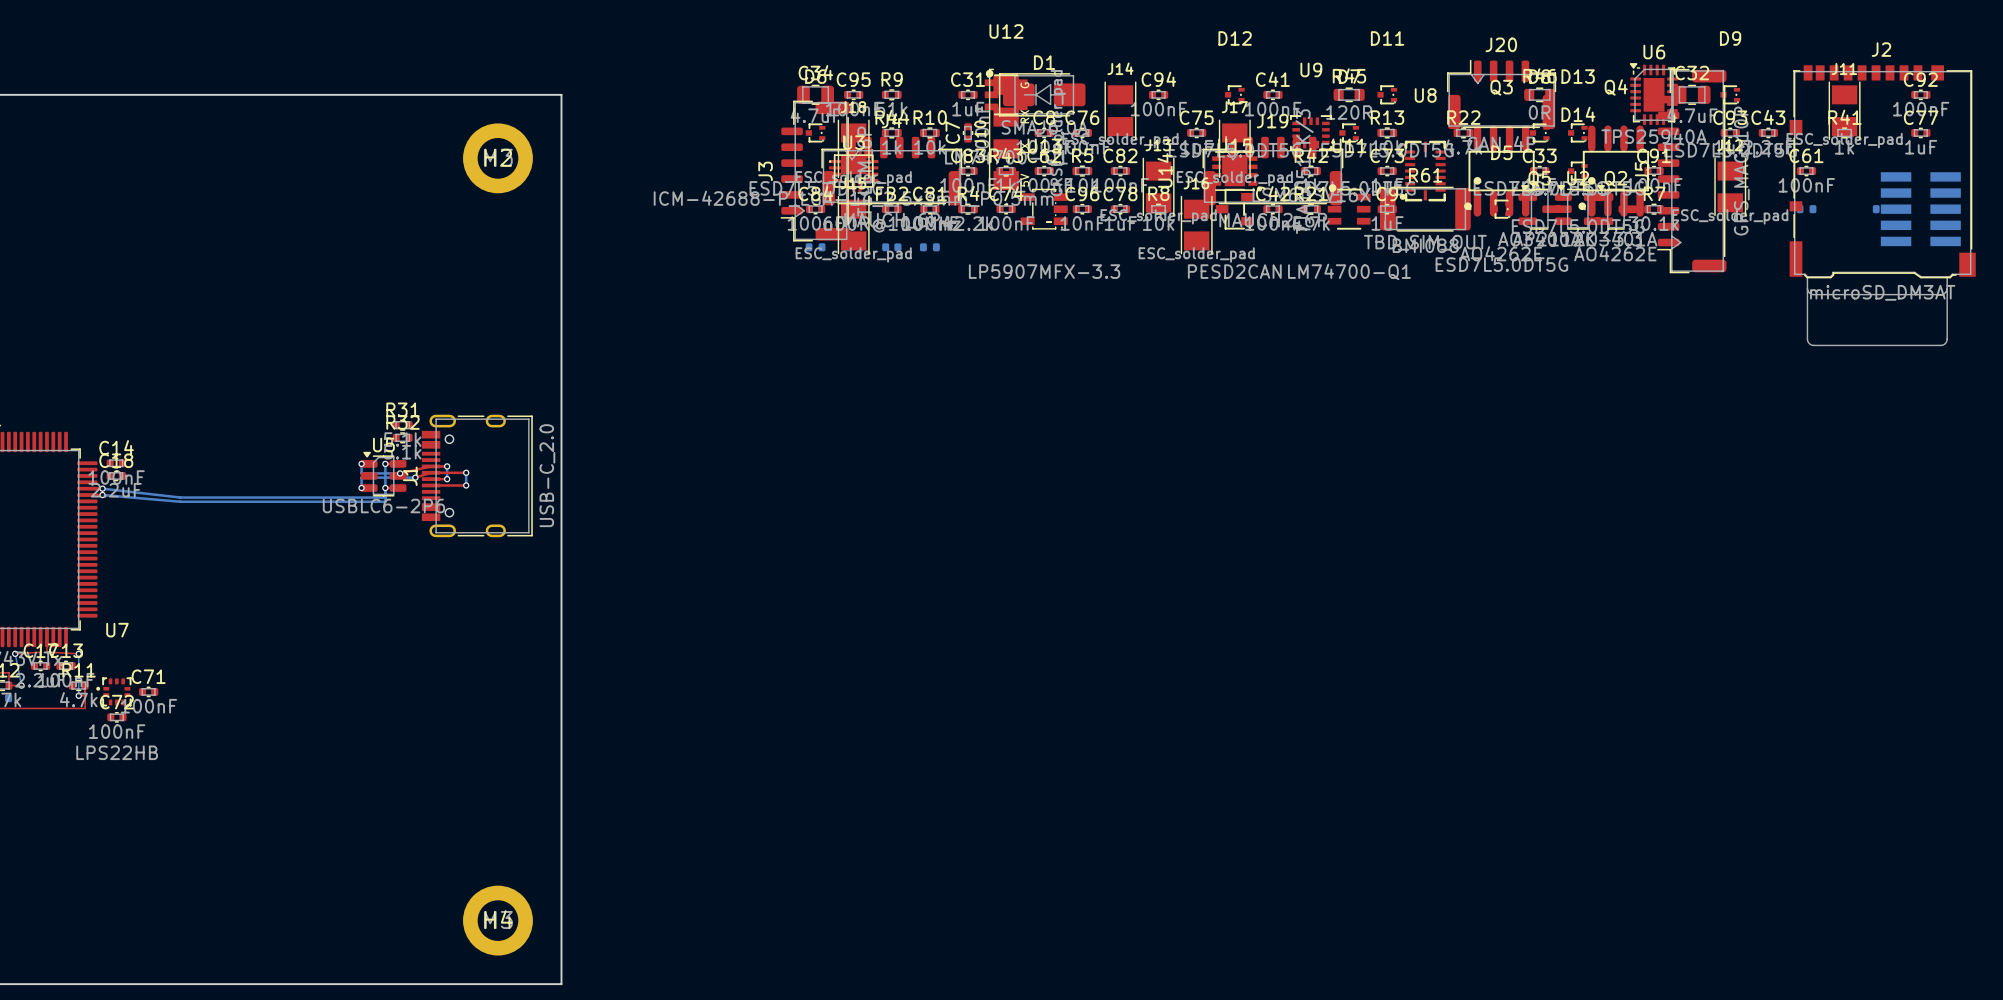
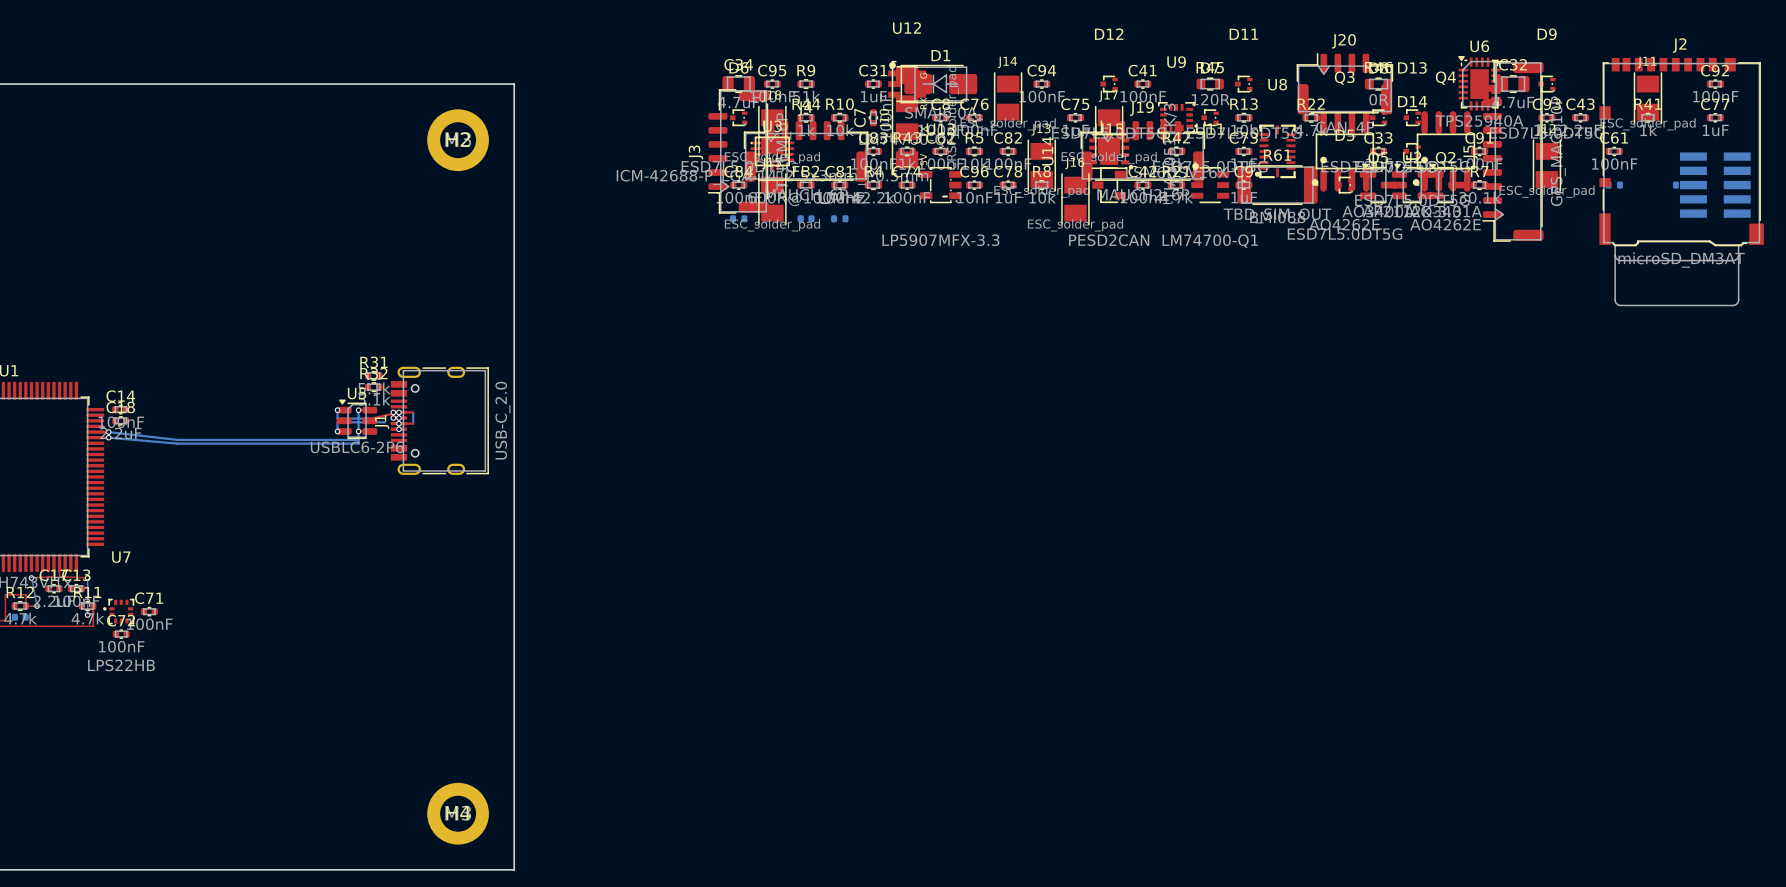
via: none -> (393, 412)
via: none -> (398, 412)
via: (447, 466) -> none
via: none -> (393, 418)
via: none -> (398, 418)
top track: (466, 472) (431, 472) (415, 477) -> none
bottom track: (466, 472) (466, 485) -> none
via: (466, 472) -> none
via: (400, 473) -> none
via: (415, 477) -> none
via: none -> (398, 423)
via: (447, 479) -> none
top track: (431, 485) (466, 485) -> none
via: none -> (398, 429)
via: (466, 485) -> none

